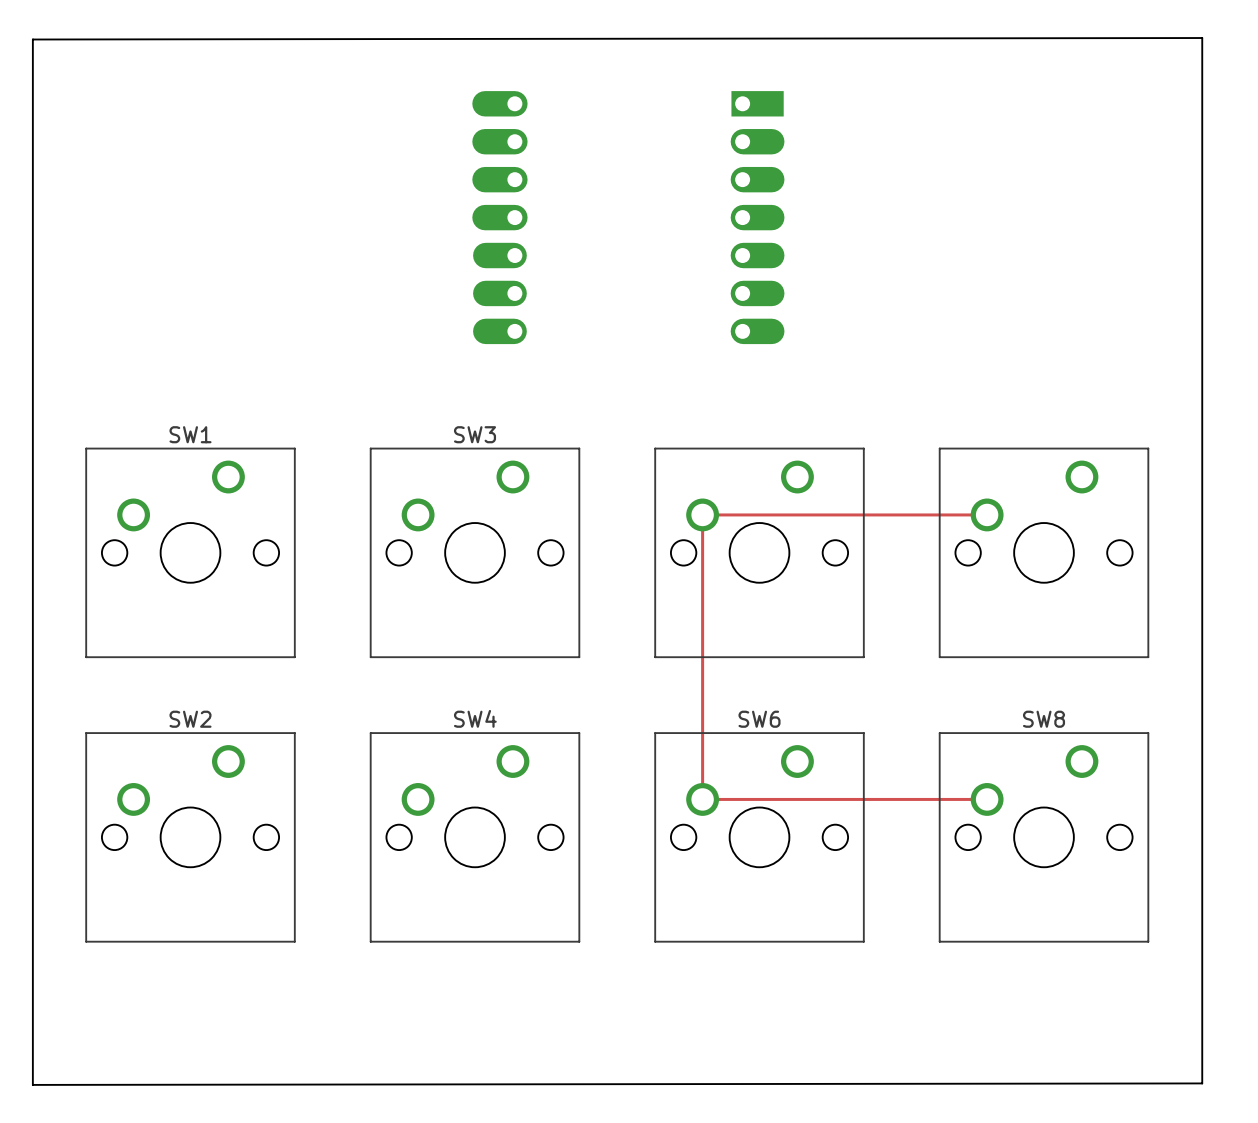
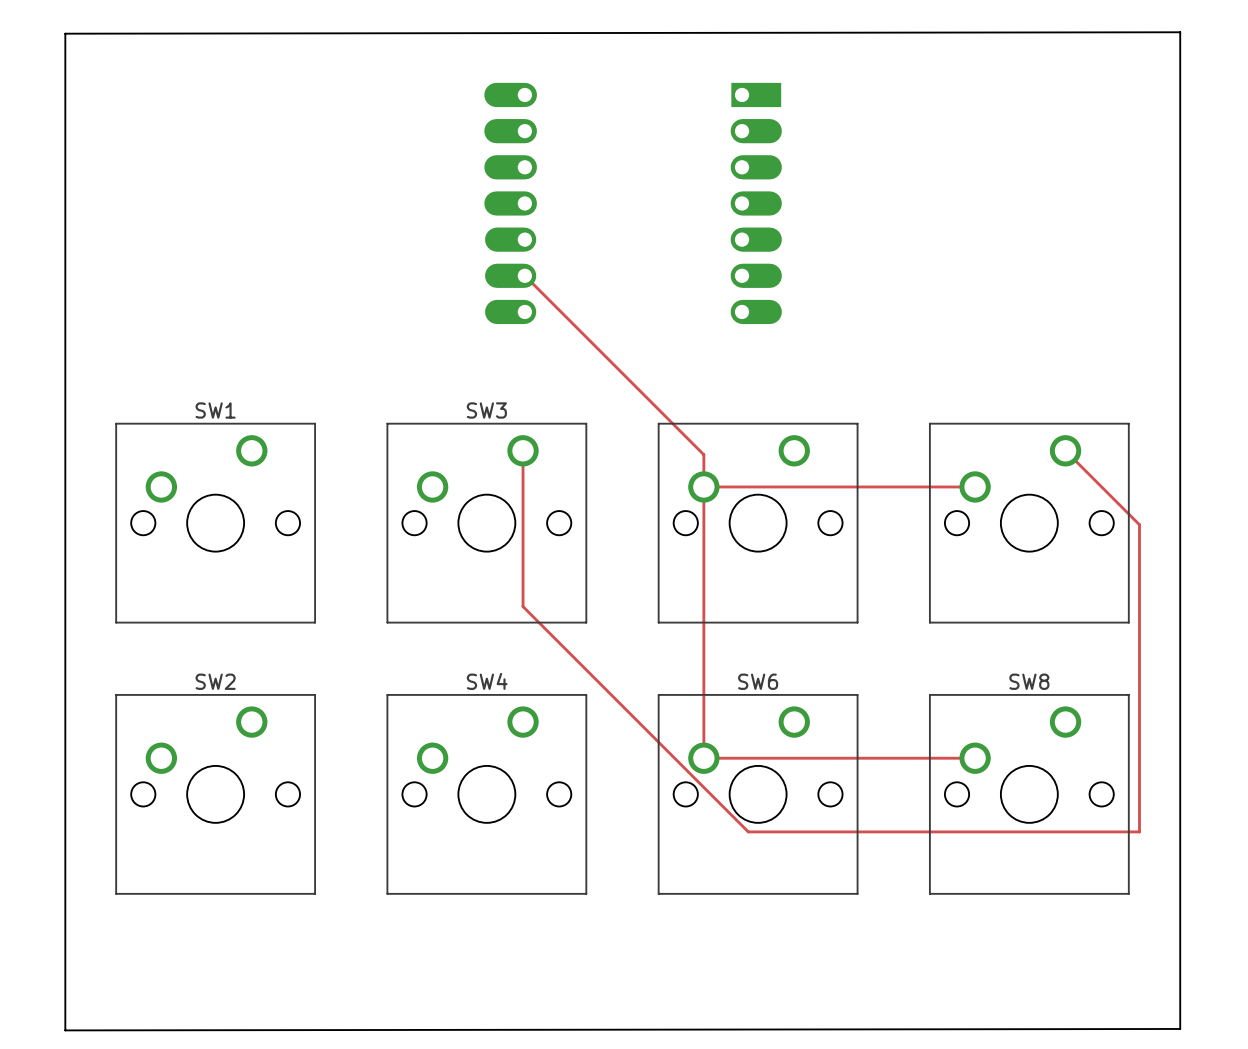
track: none -> (524, 275) (703, 454) (703, 486)
track: none -> (523, 450) (523, 606) (748, 831) (1139, 831) (1139, 524) (1065, 450)

